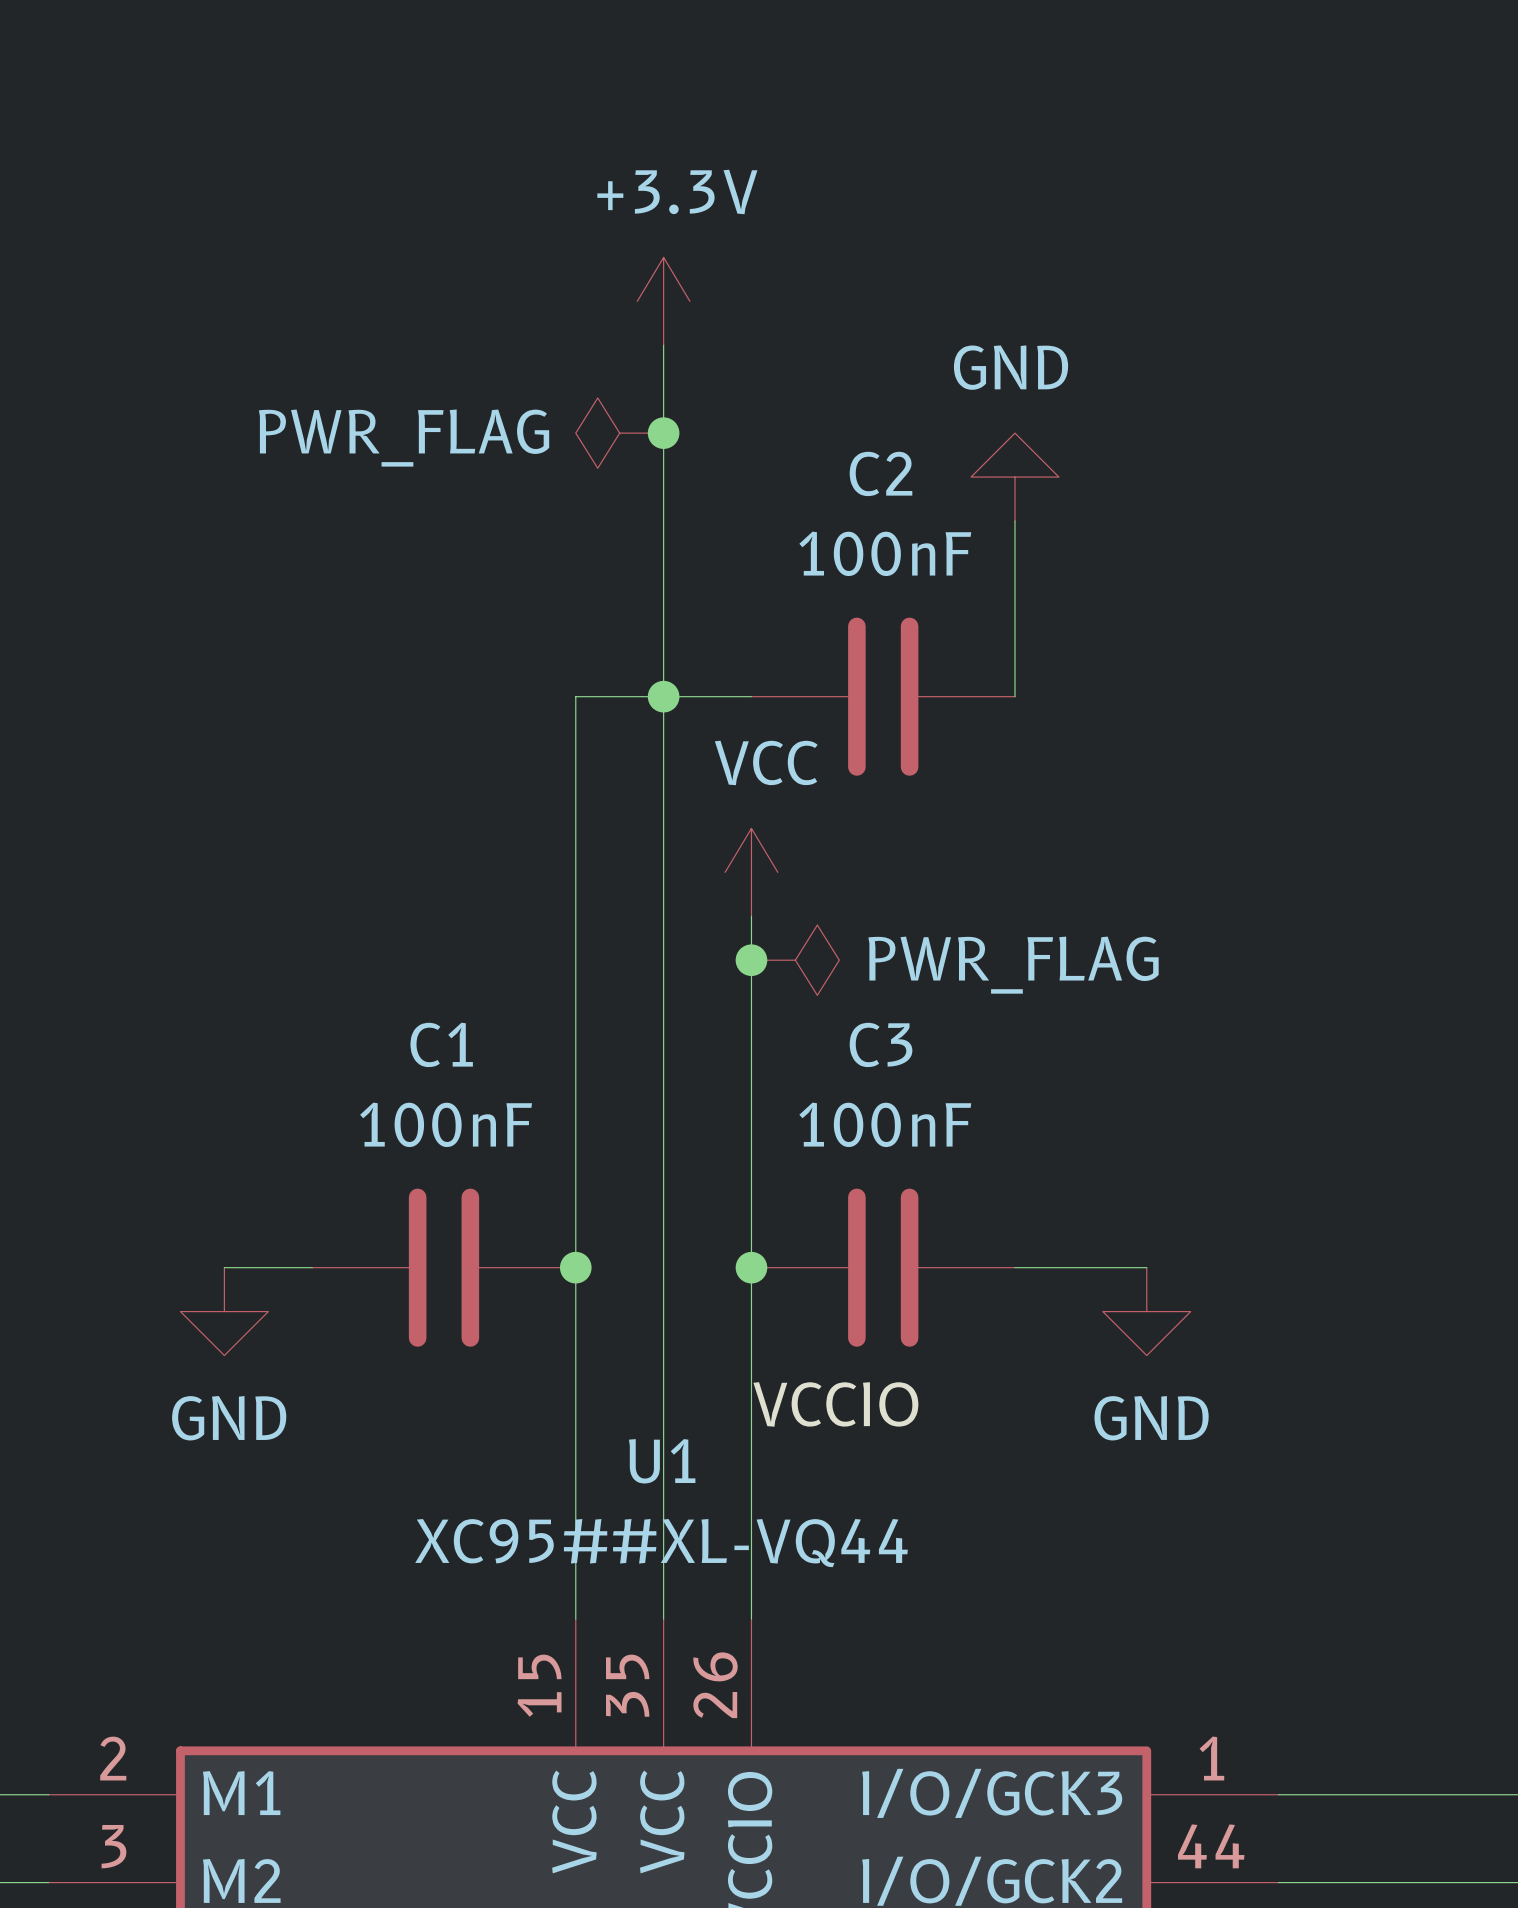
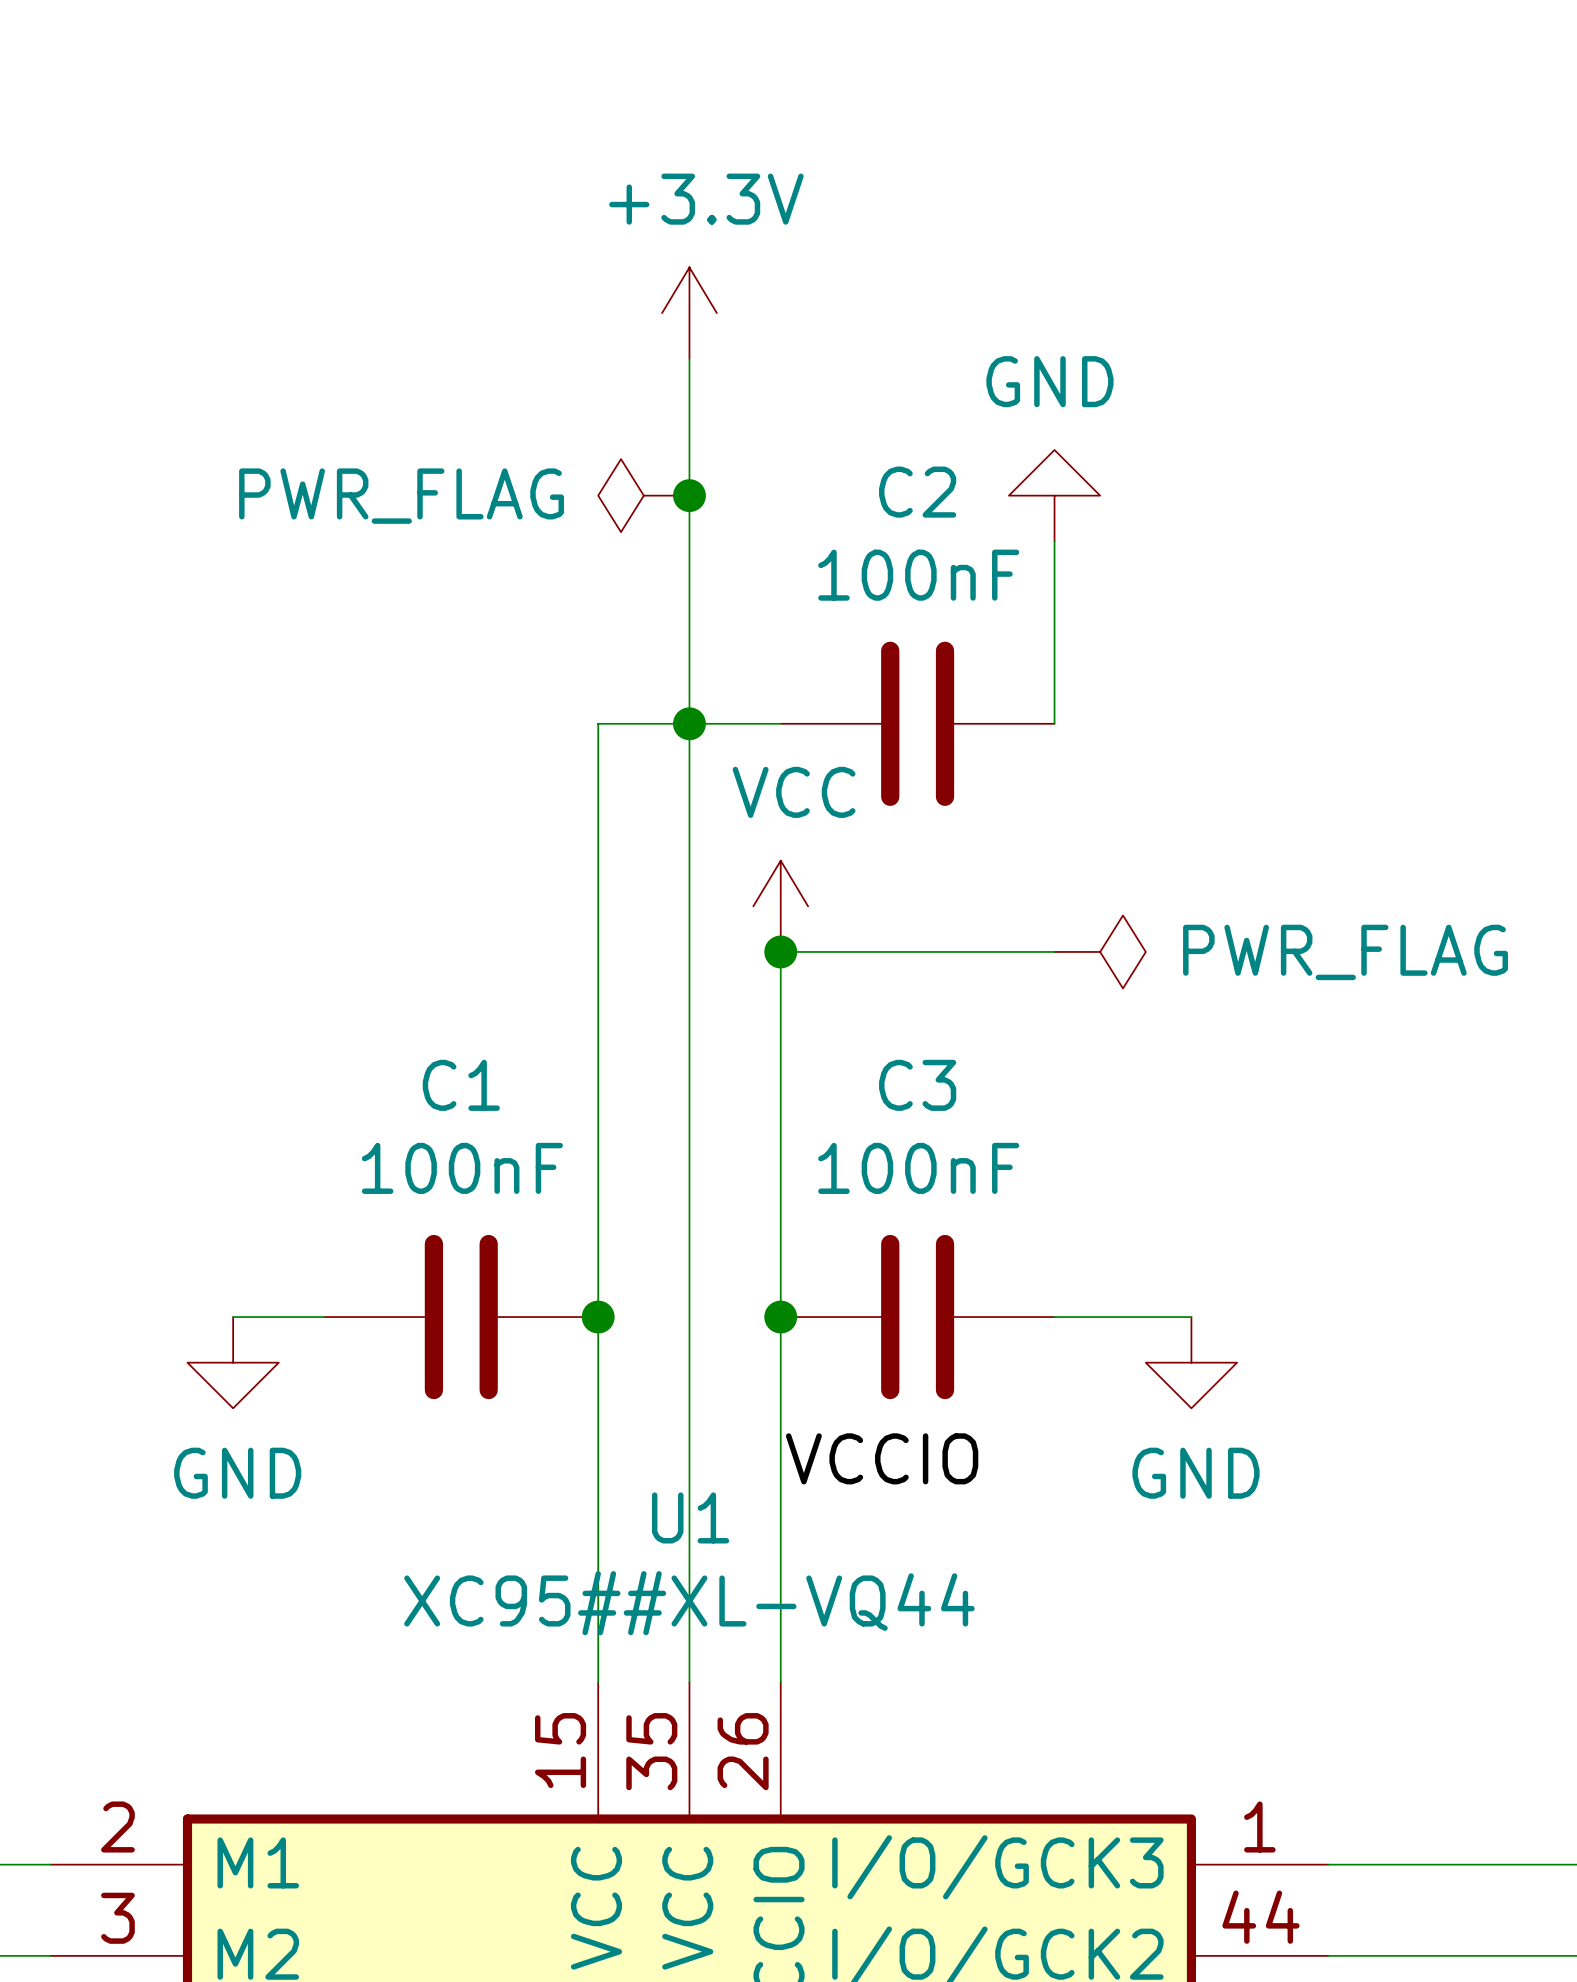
power symbol position: PWR_FLAG (619, 433) -> PWR_FLAG (643, 495)
junction position: (663, 433) -> (689, 495)
wire: none -> (780, 951) (1054, 951)
power symbol: none -> PWR_FLAG (1100, 951)
junction position: (751, 960) -> (780, 951)
power symbol: PWR_FLAG (795, 960) -> none

